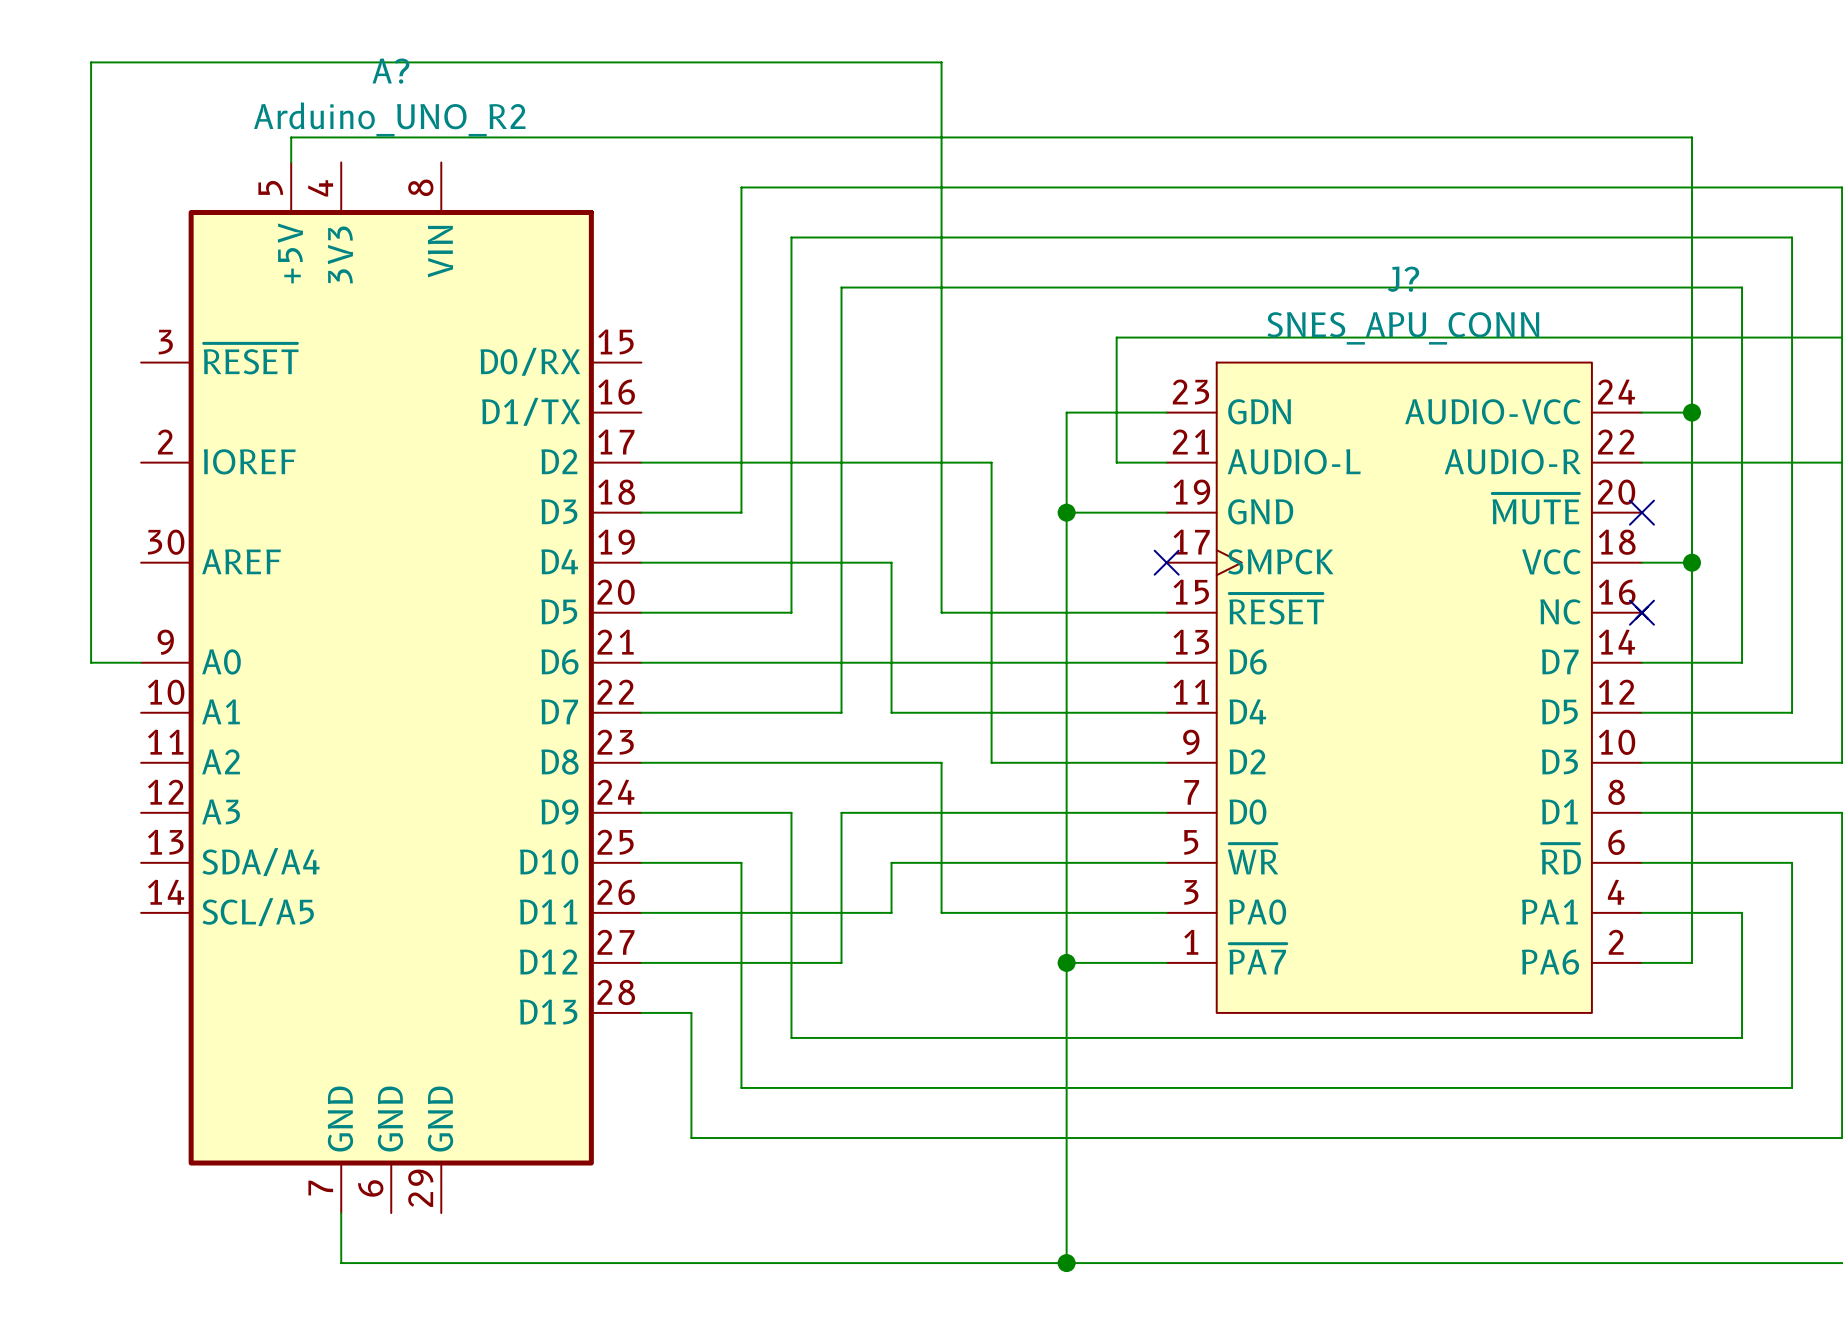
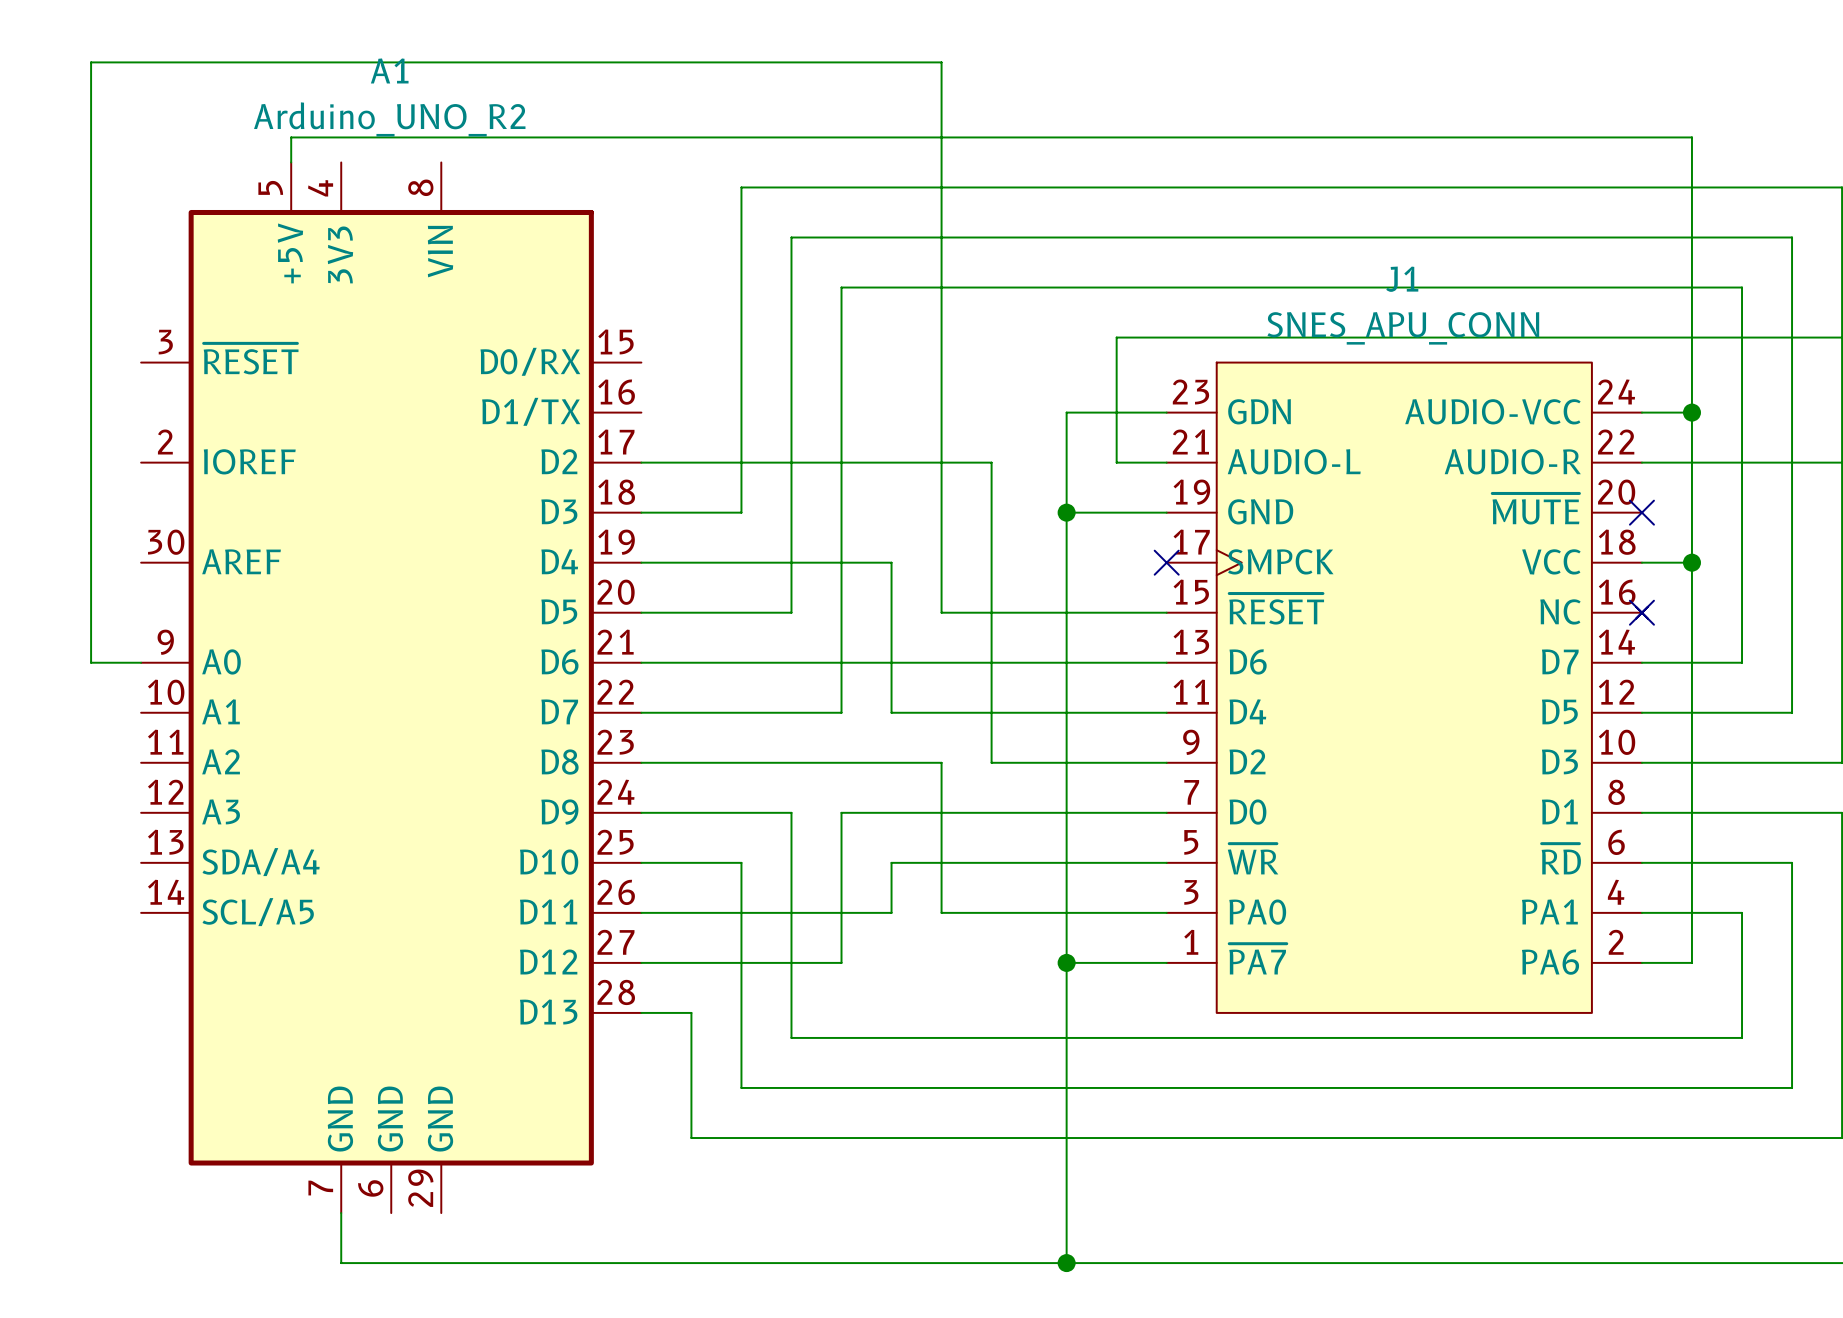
A? name: A? (390, 71) -> A1 (389, 70)
J? name: J? (1403, 279) -> J1 (1402, 279)

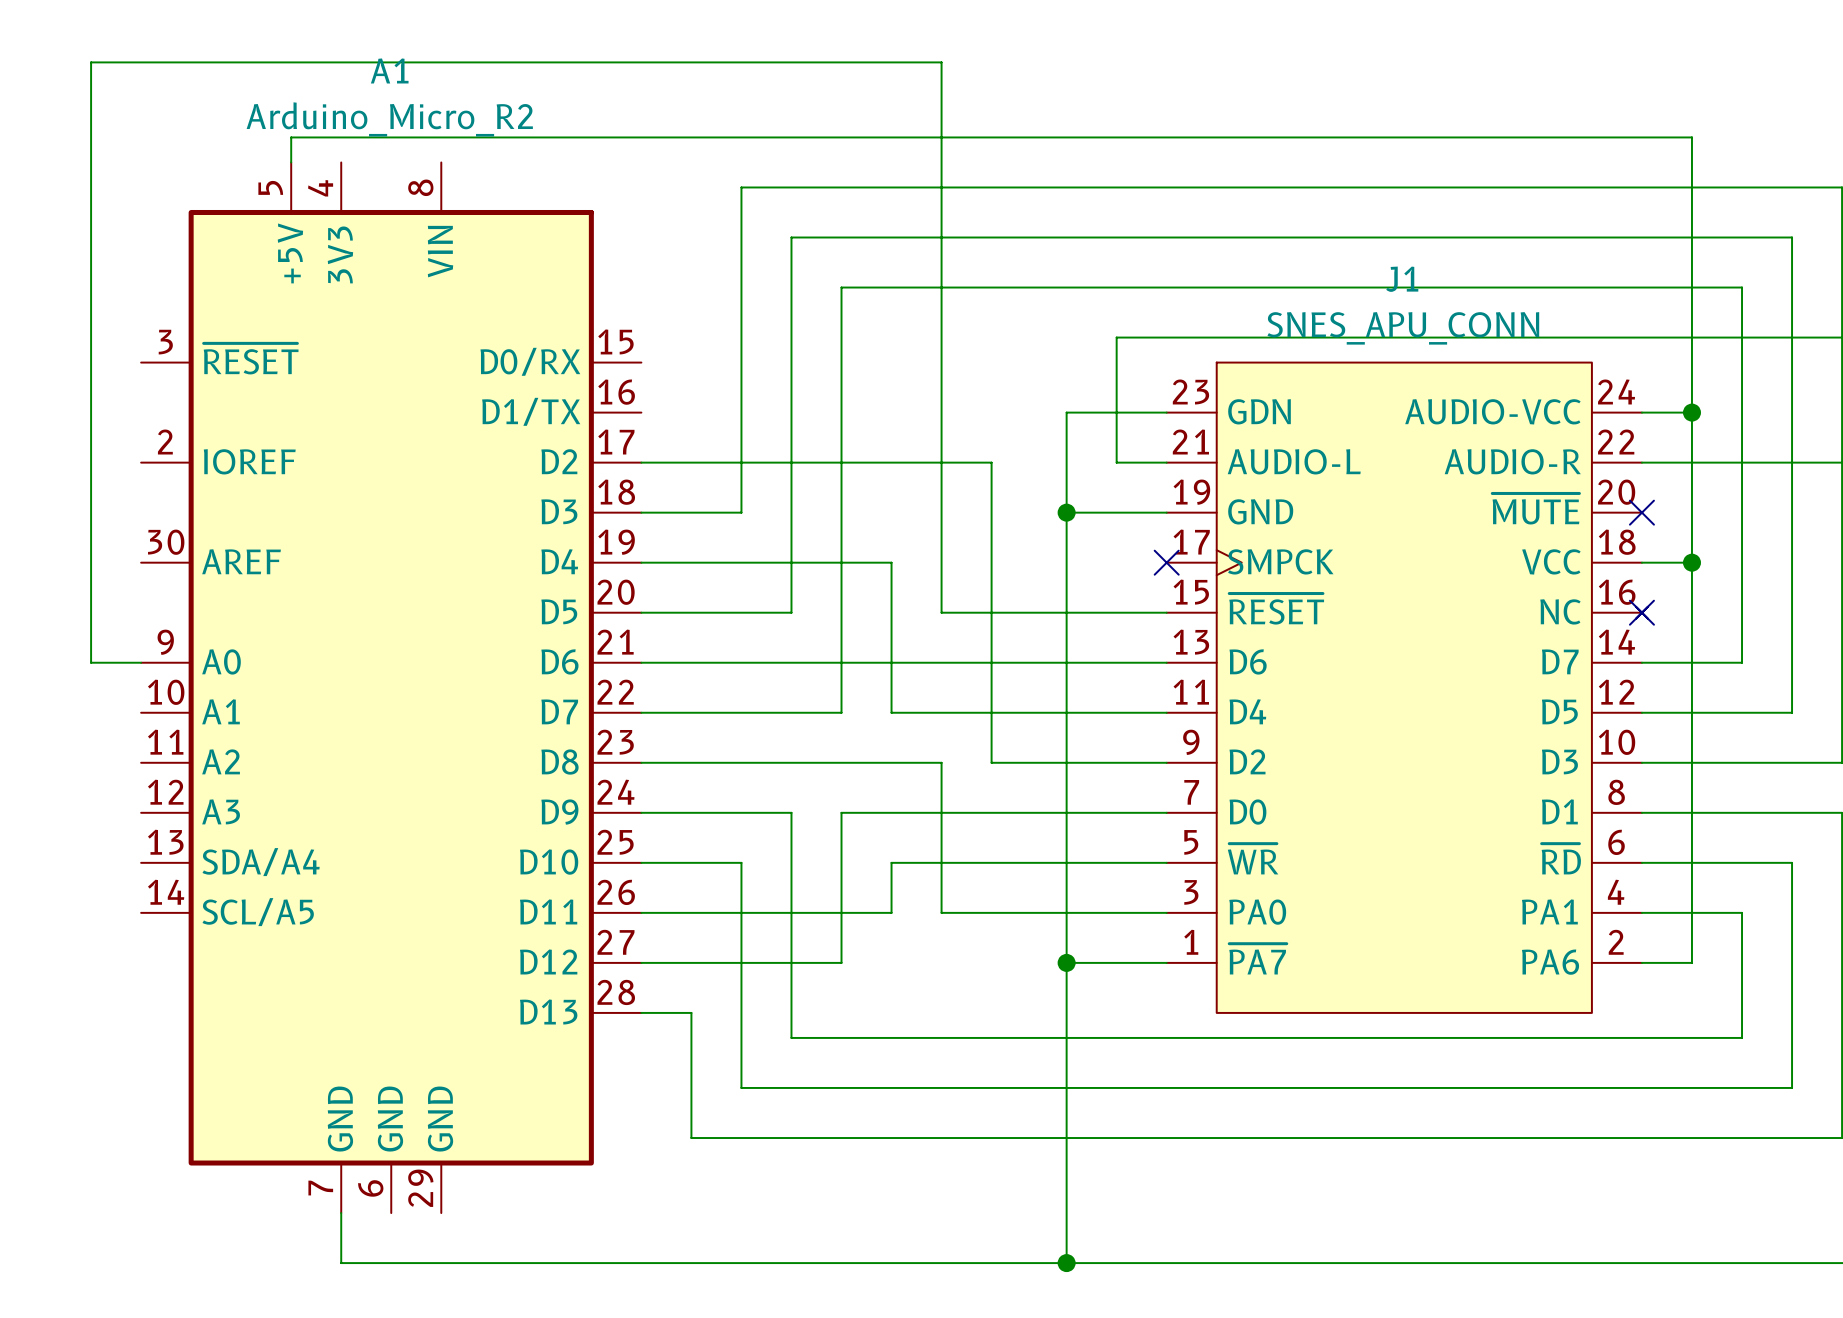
A1 value: Arduino_UNO_R2 (389, 119) -> Arduino_Micro_R2 (389, 119)

